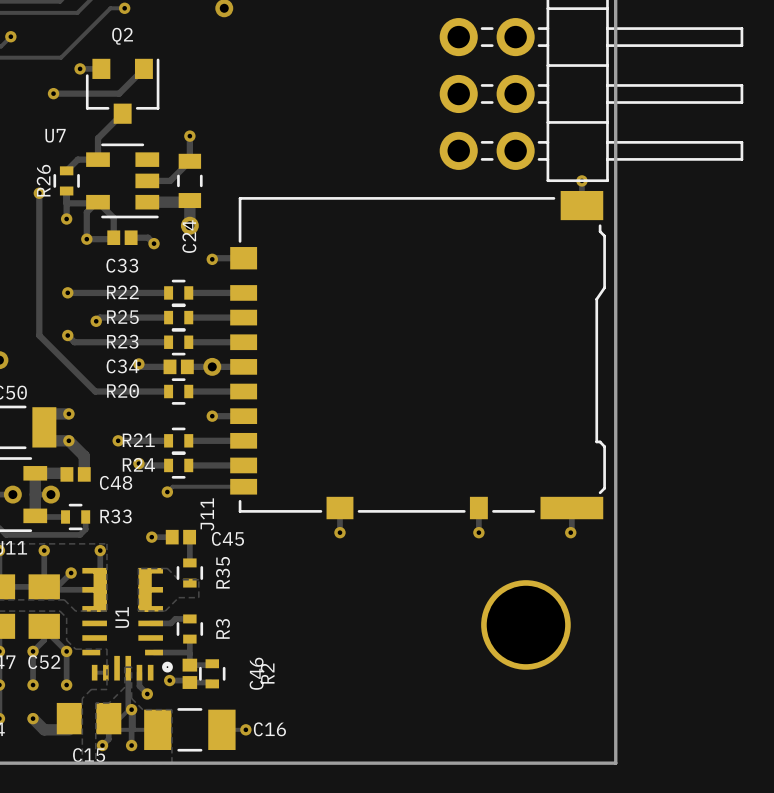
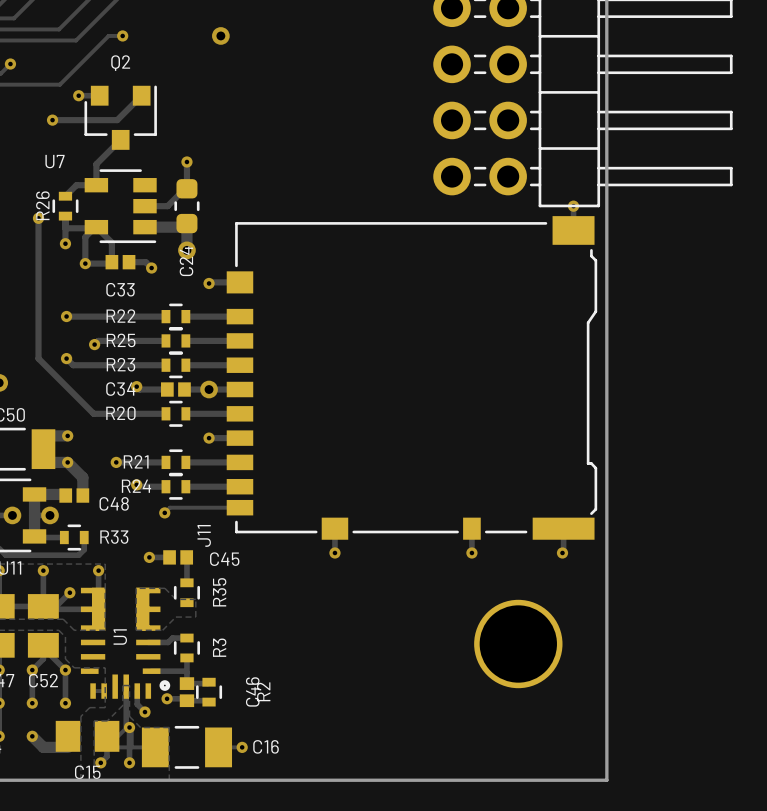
C24 footprint: [177, 153, 203, 209] -> [174, 179, 200, 234]

